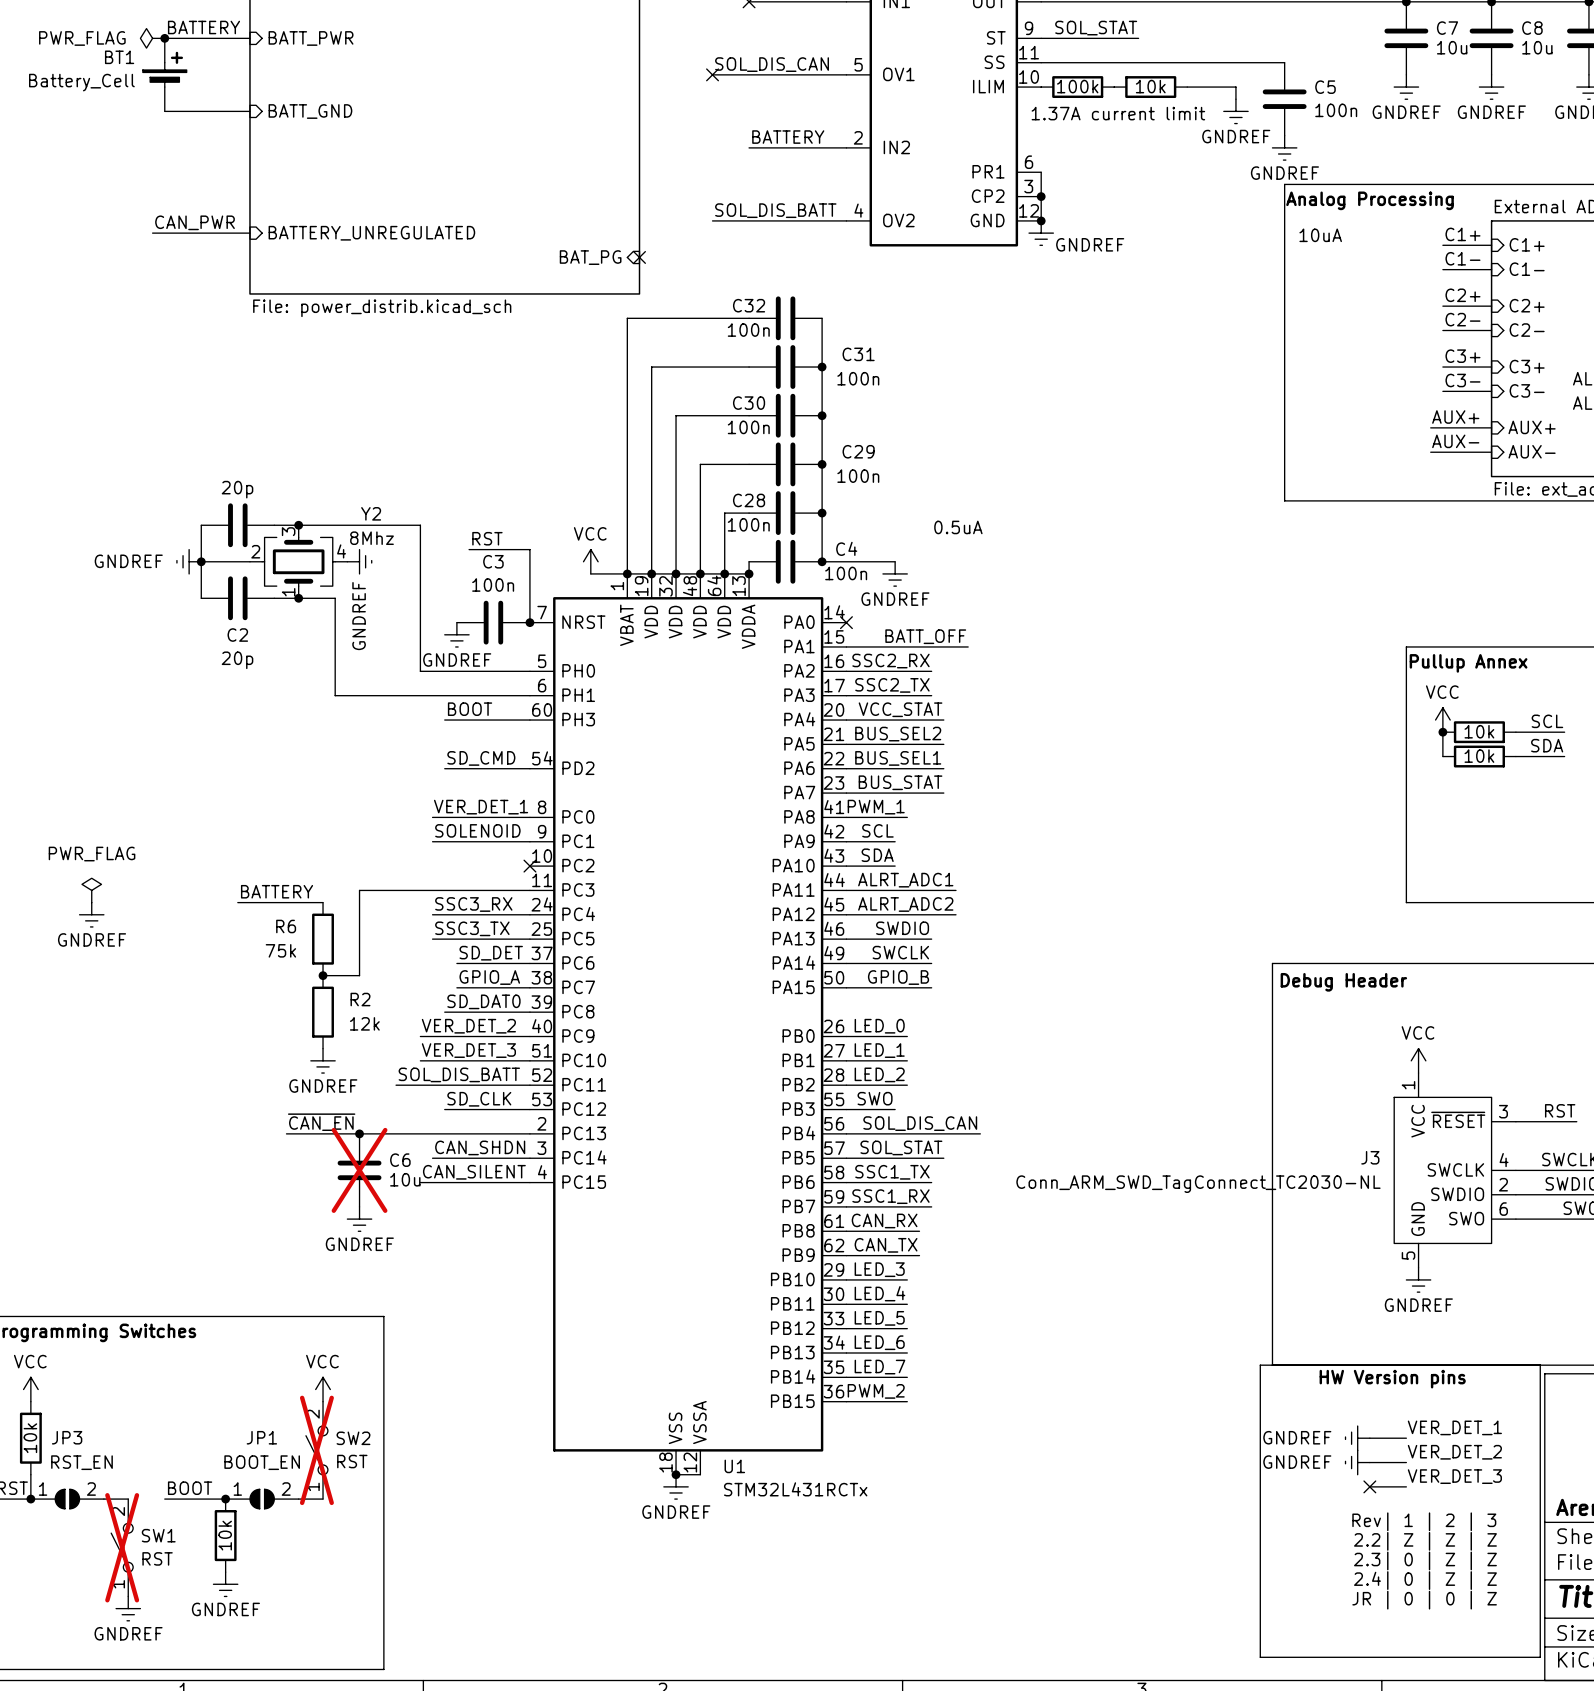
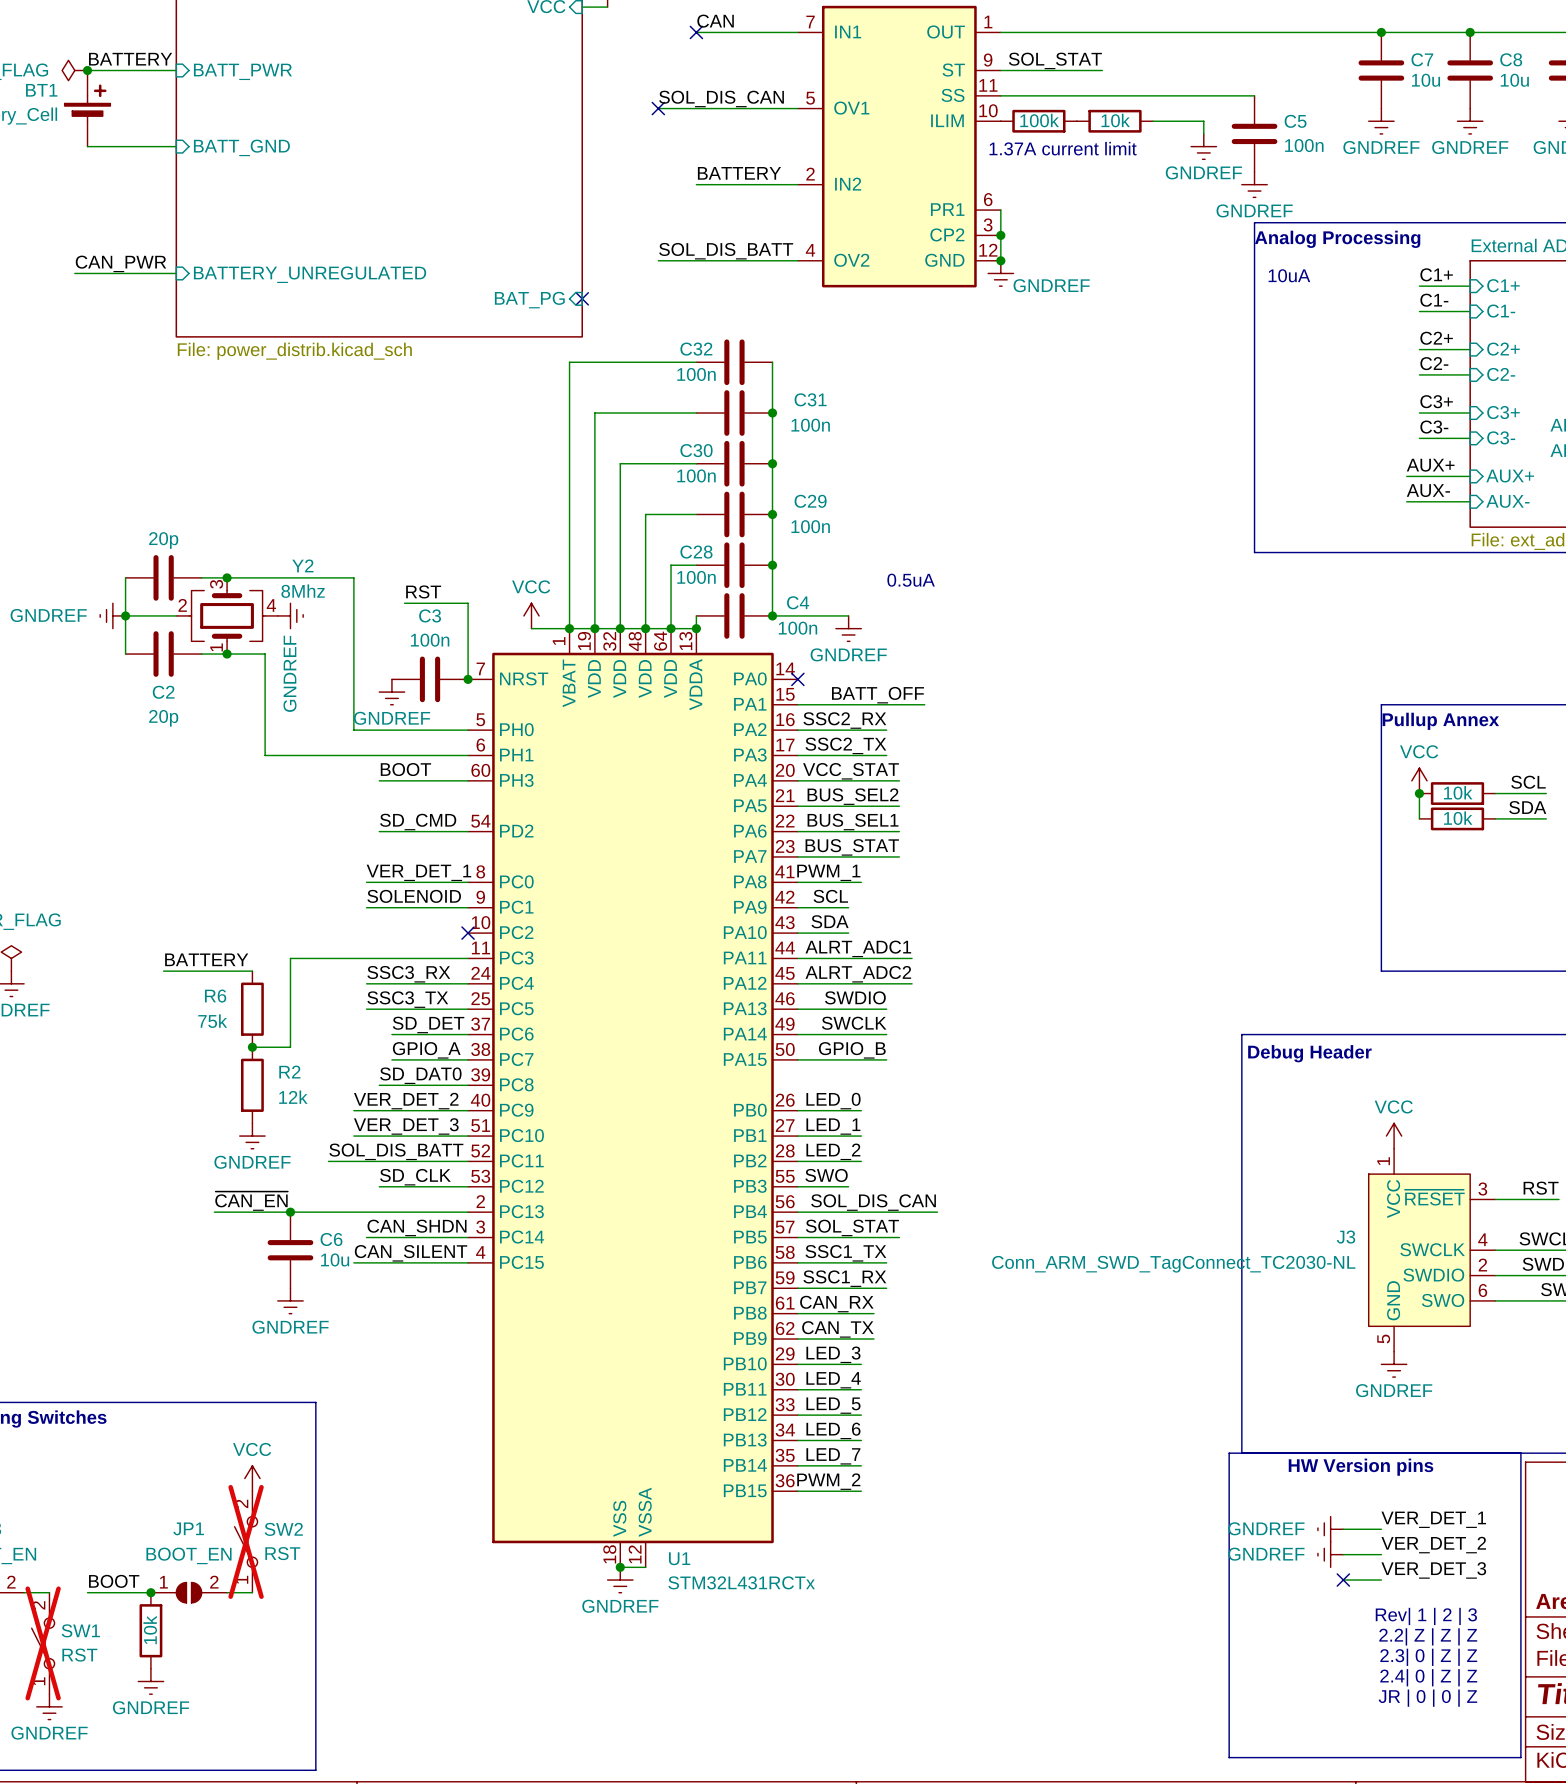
C6 do-not-place cross: (359, 1170) -> none

